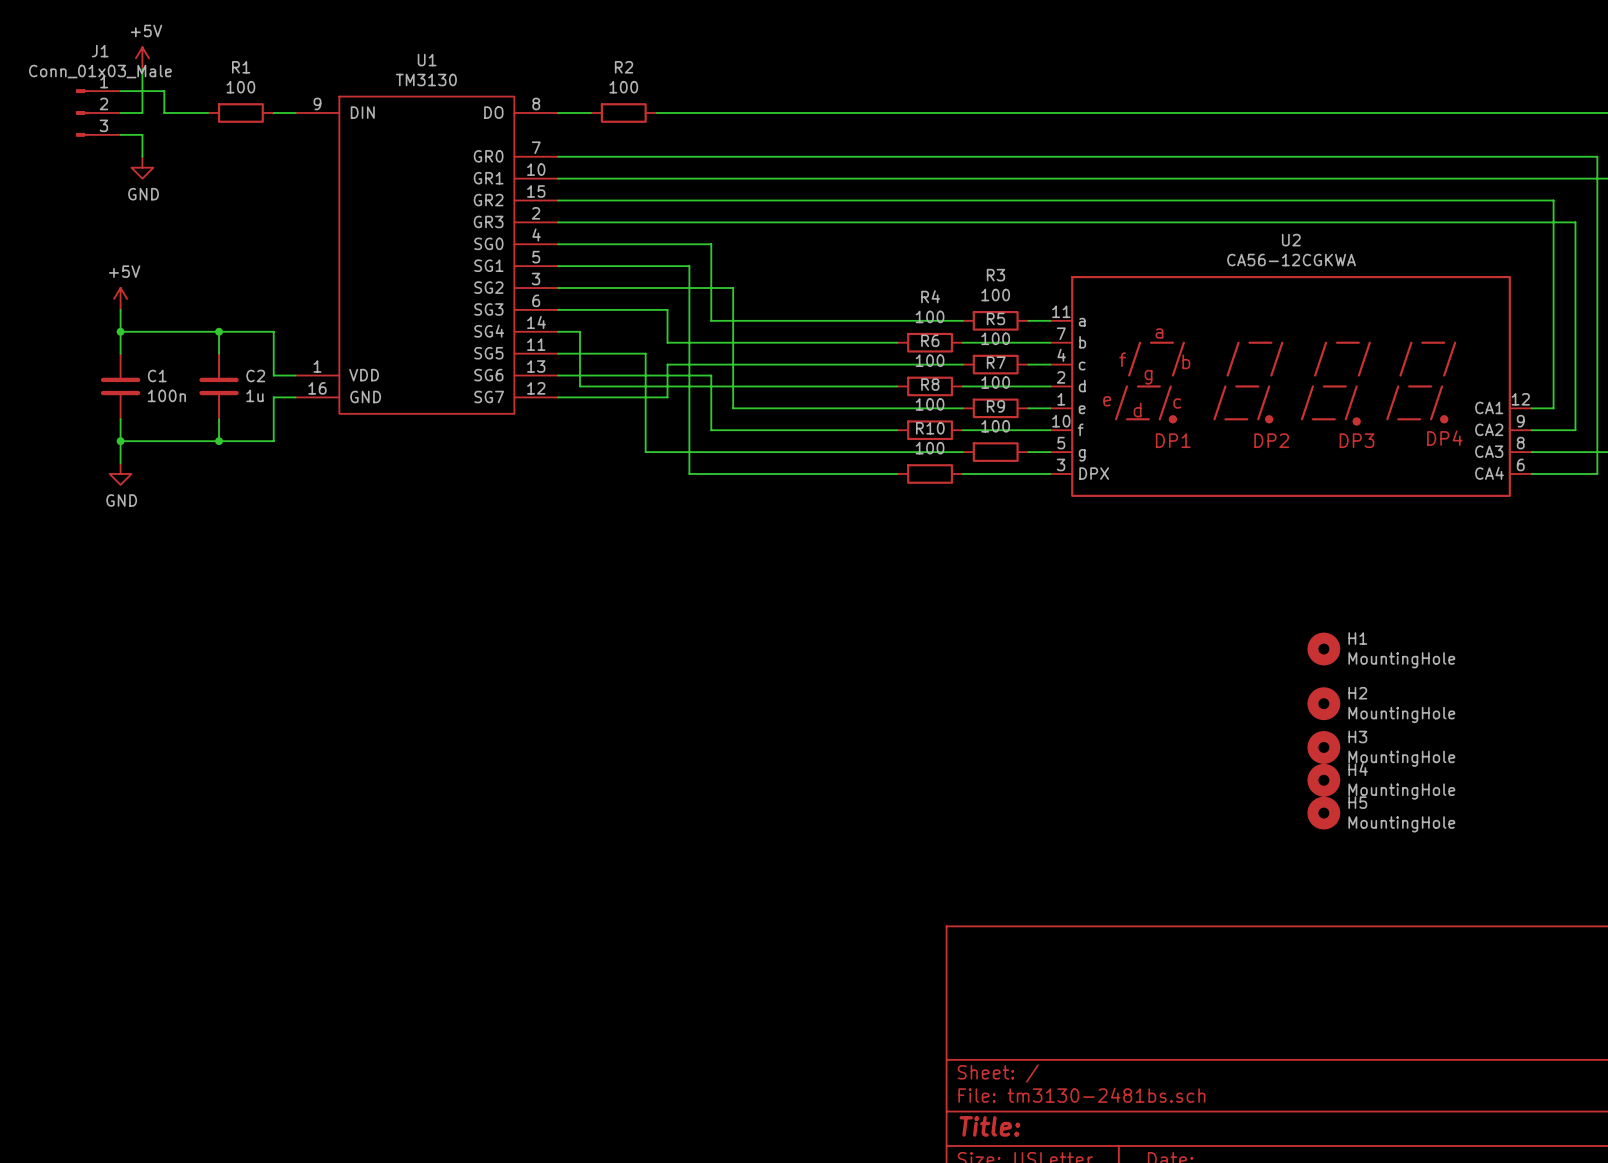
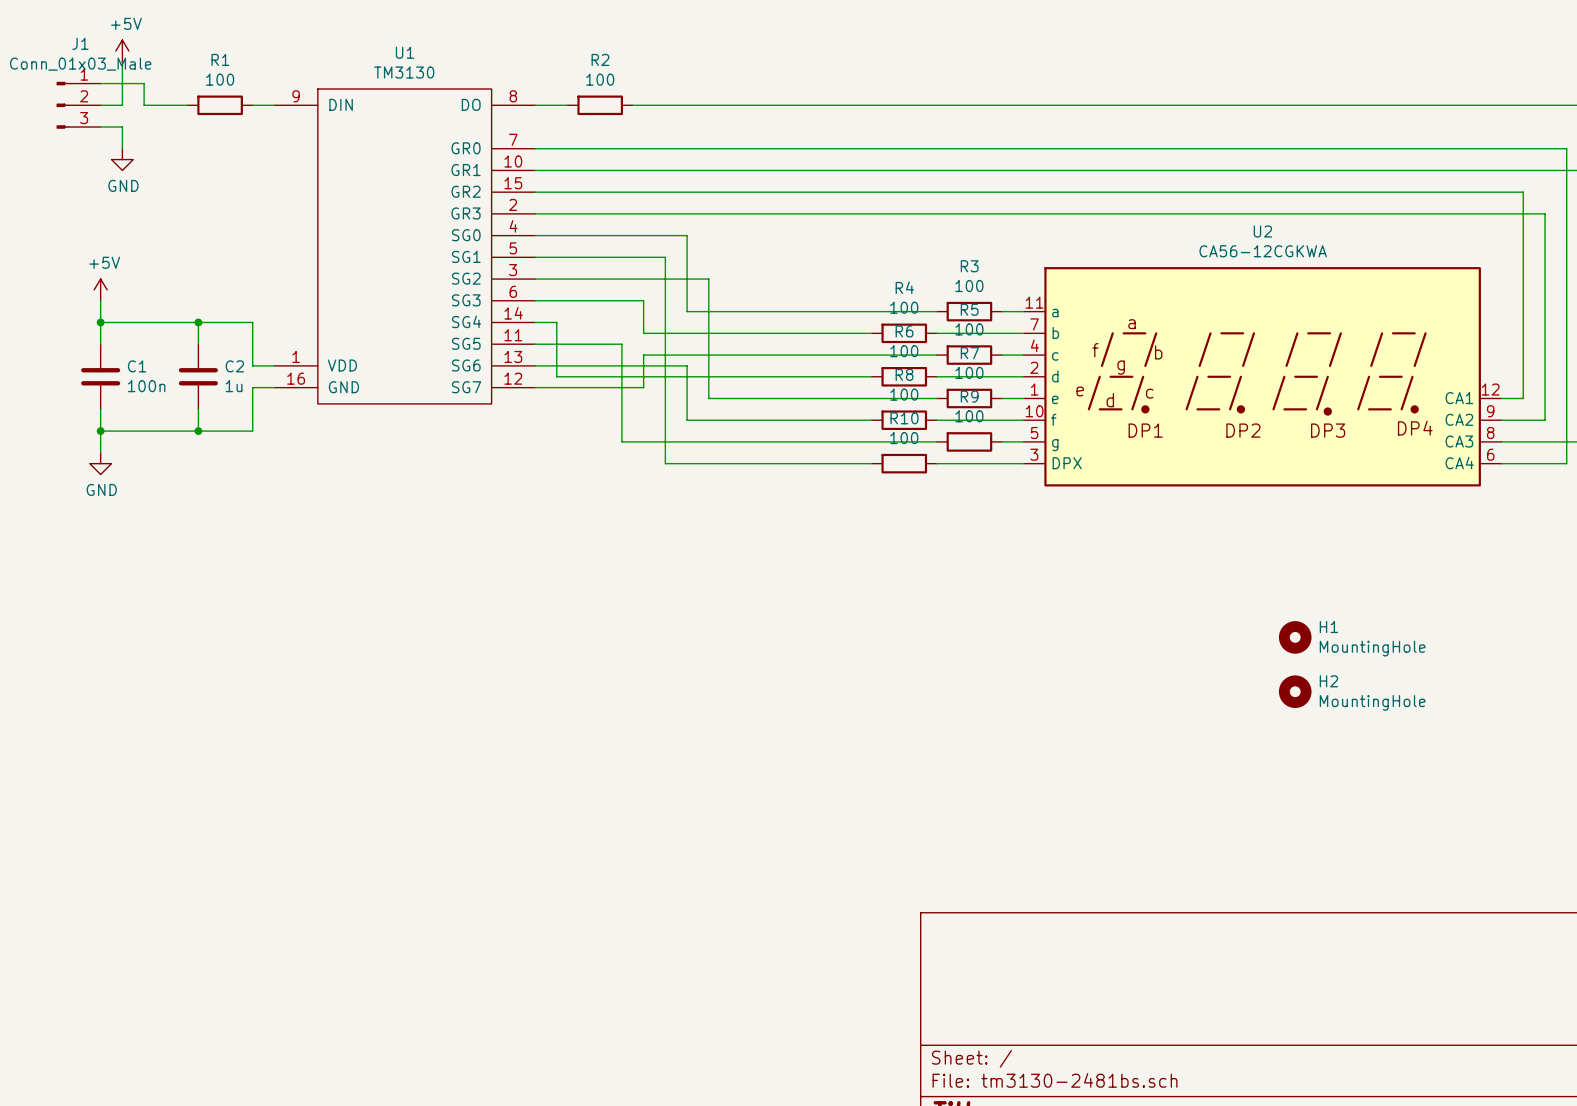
H3: MountingHole (1323, 747) -> none
H4: MountingHole (1323, 780) -> none
H5: MountingHole (1323, 813) -> none

